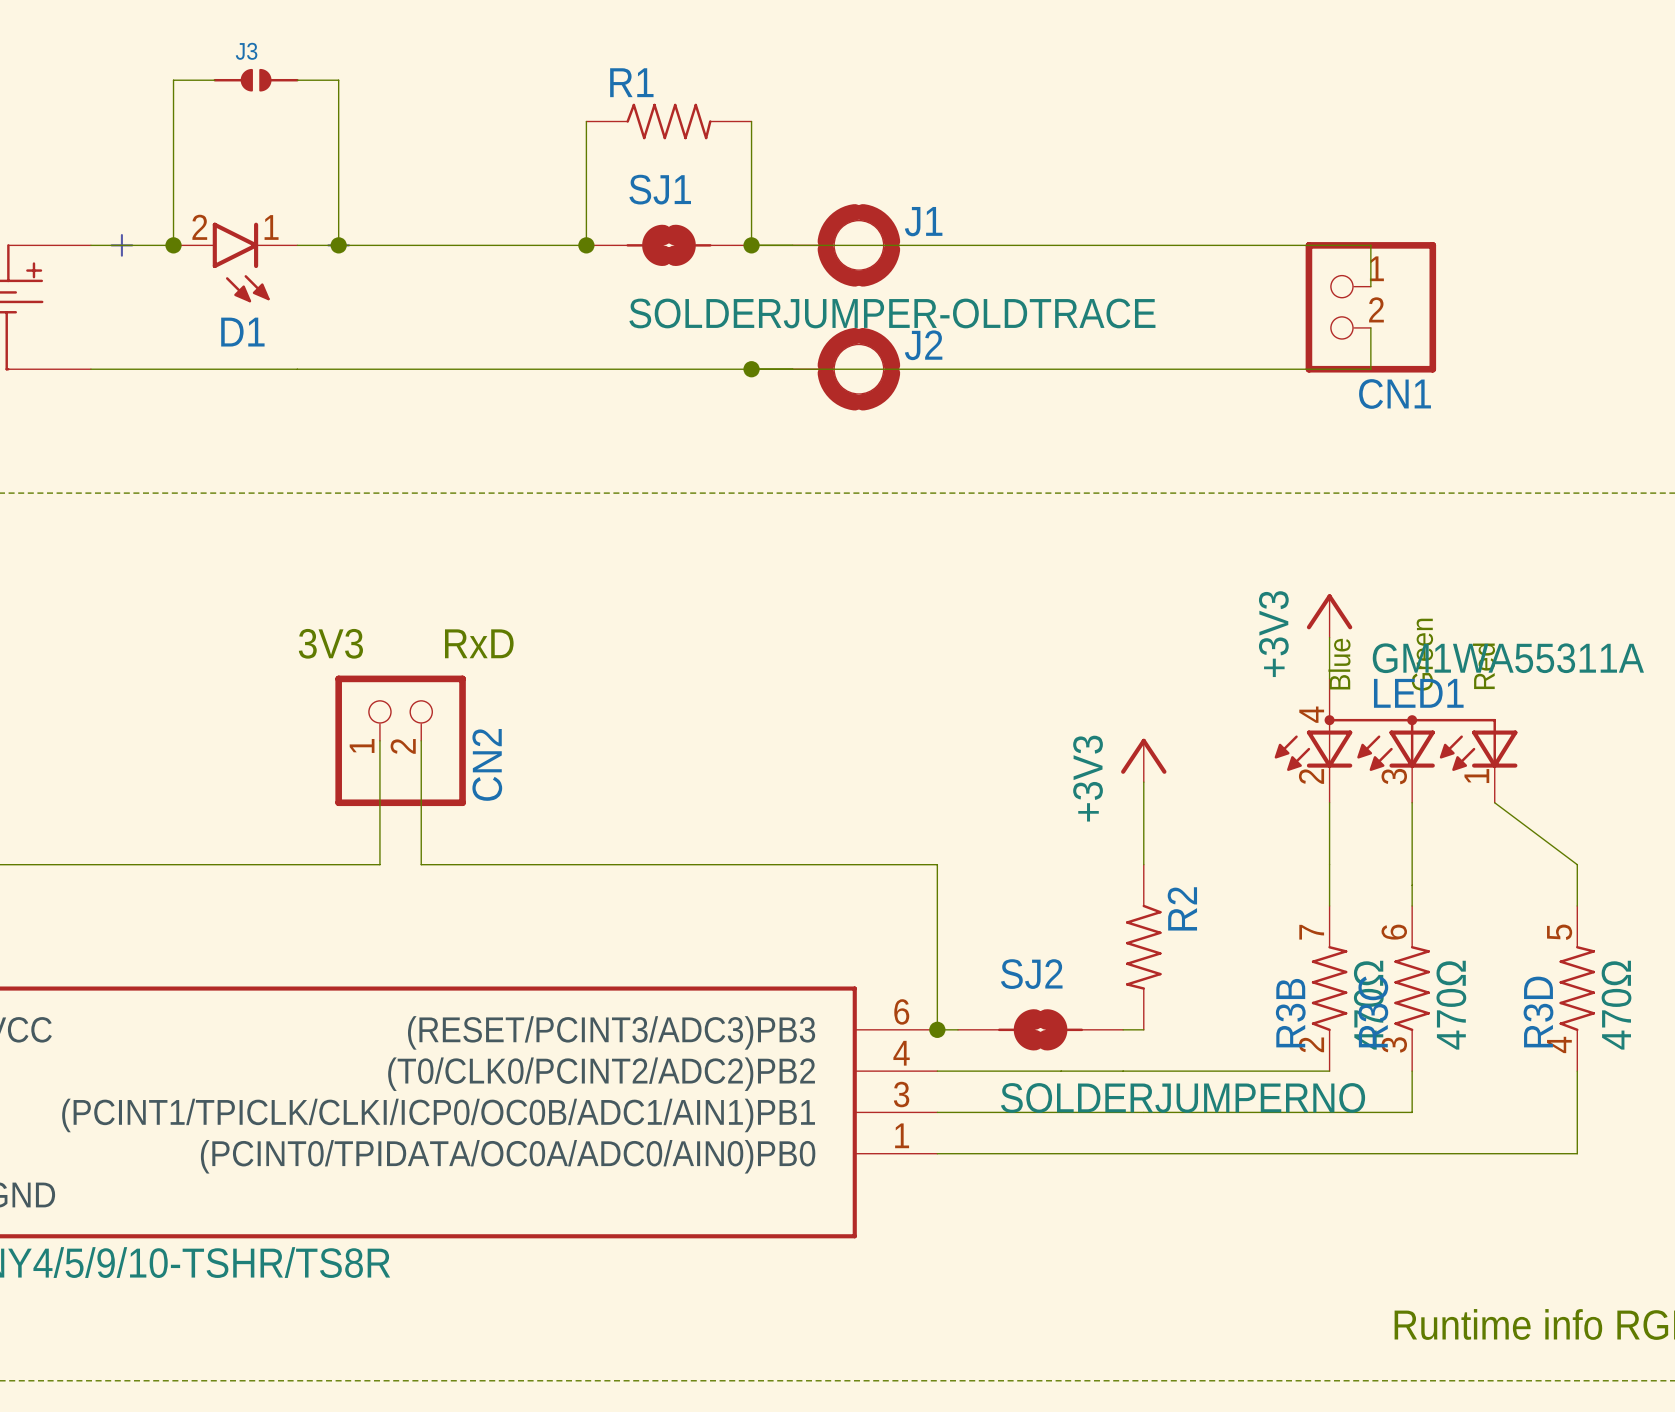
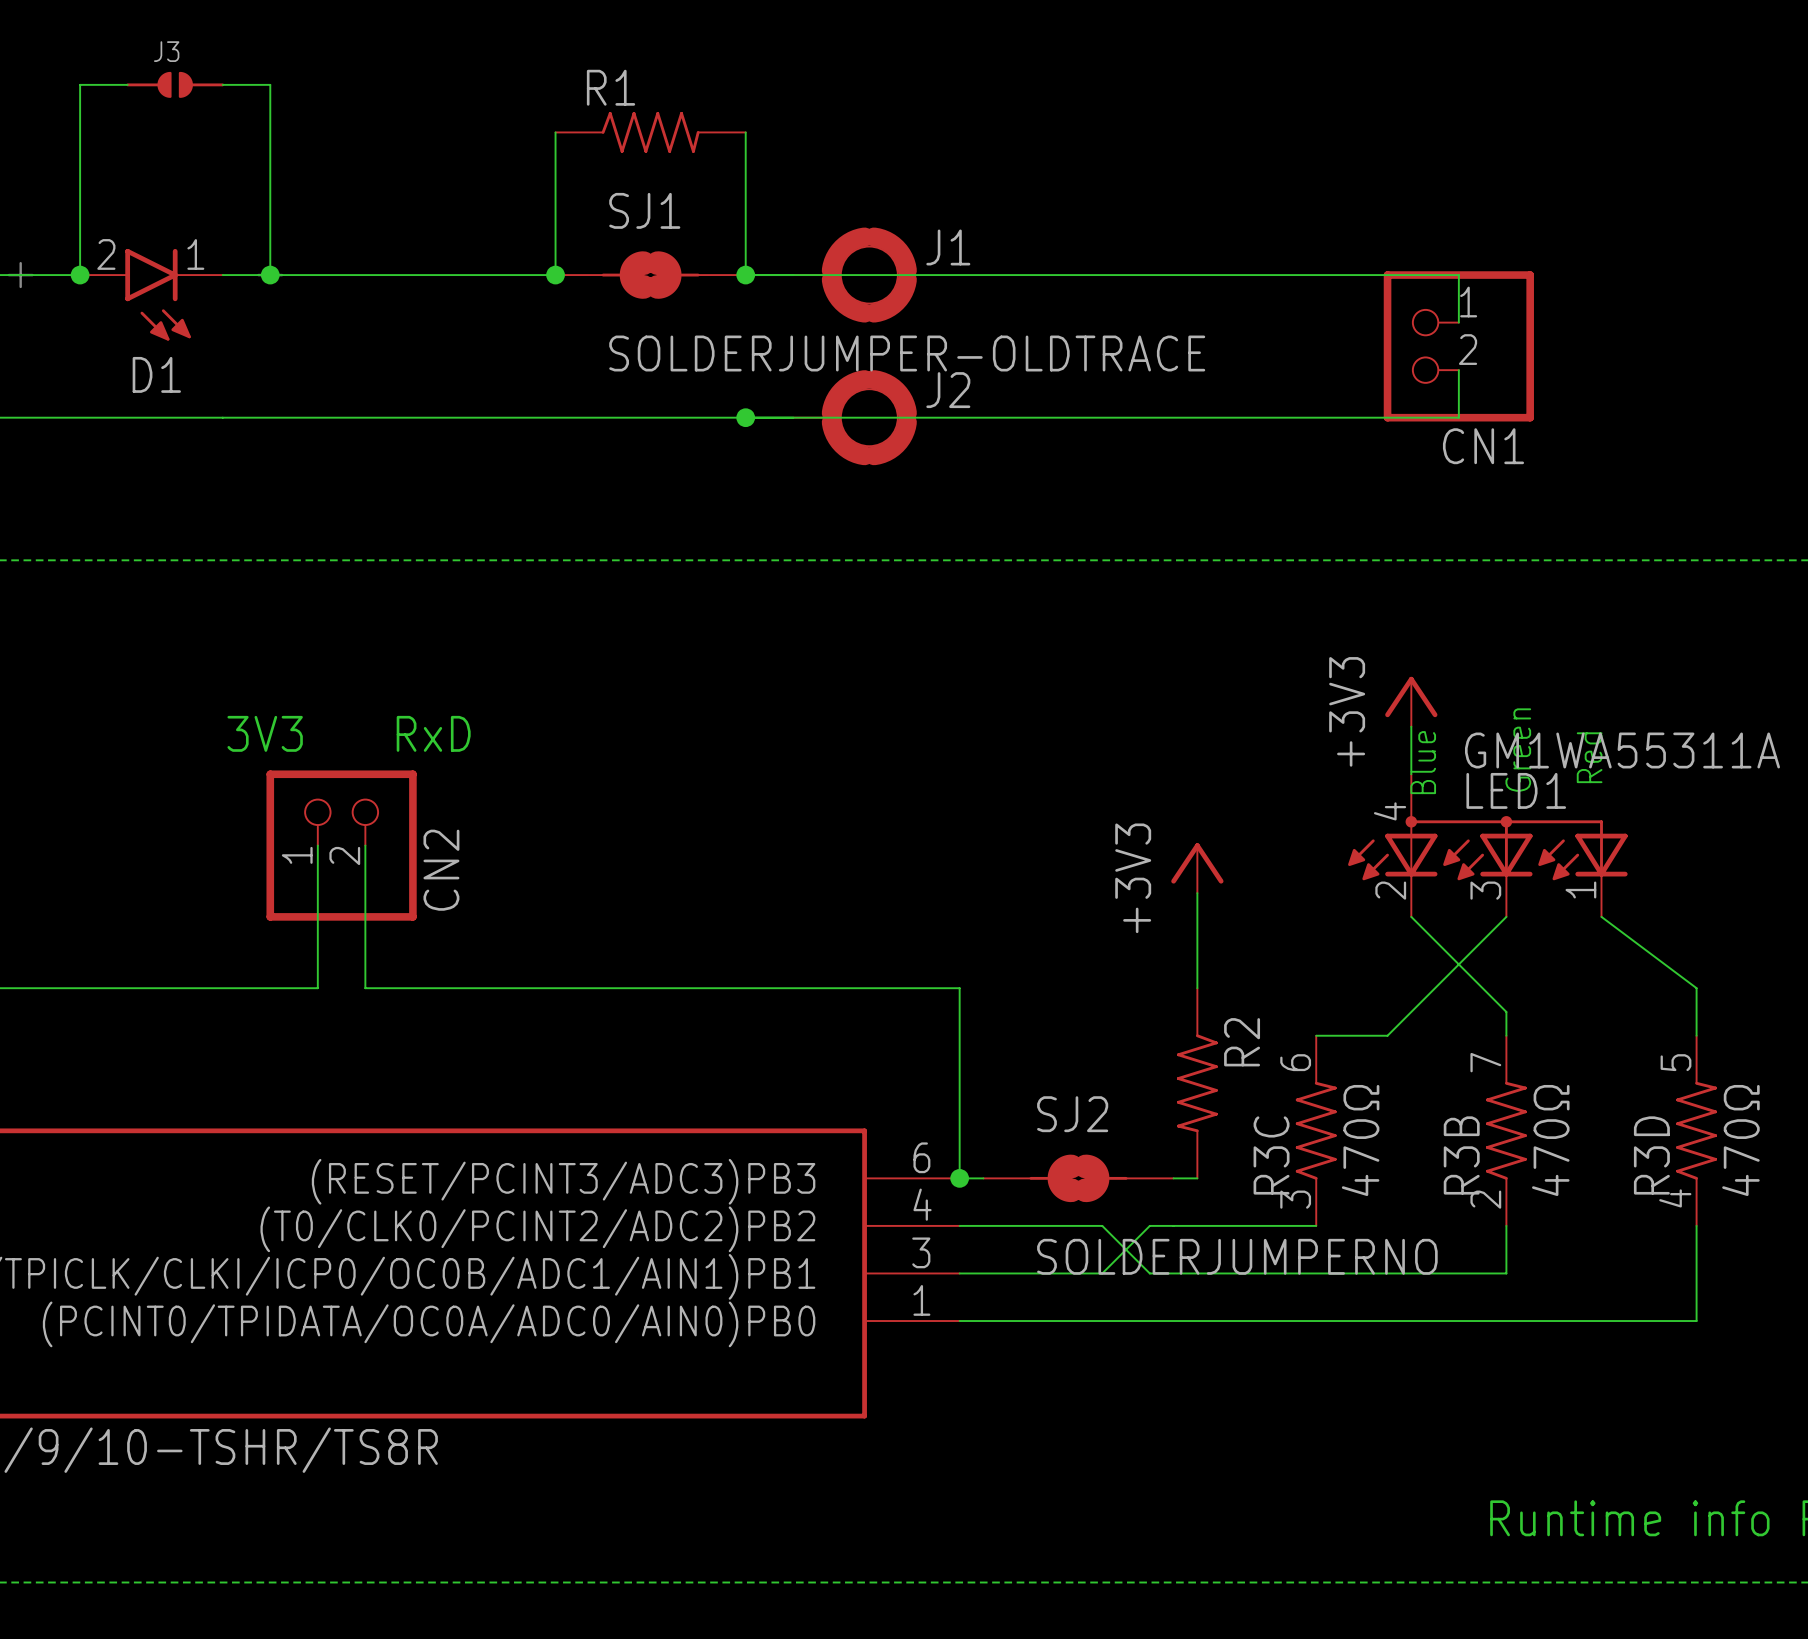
wire: (1329, 802) (1329, 905) -> none
wire: (1412, 802) (1412, 885) -> (1411, 916) (1506, 1011)
wire: none -> (1506, 916) (1387, 1035) (1316, 1035)
R3B position: (1329, 988) -> (1506, 1130)
R3C position: (1412, 988) -> (1316, 1130)
wire: (1061, 1071) (1102, 1071) -> (1102, 1225) (1149, 1273)
wire: (1247, 1071) (1329, 1071) -> none
wire: (1061, 1112) (1102, 1112) -> (1102, 1273) (1149, 1225)

